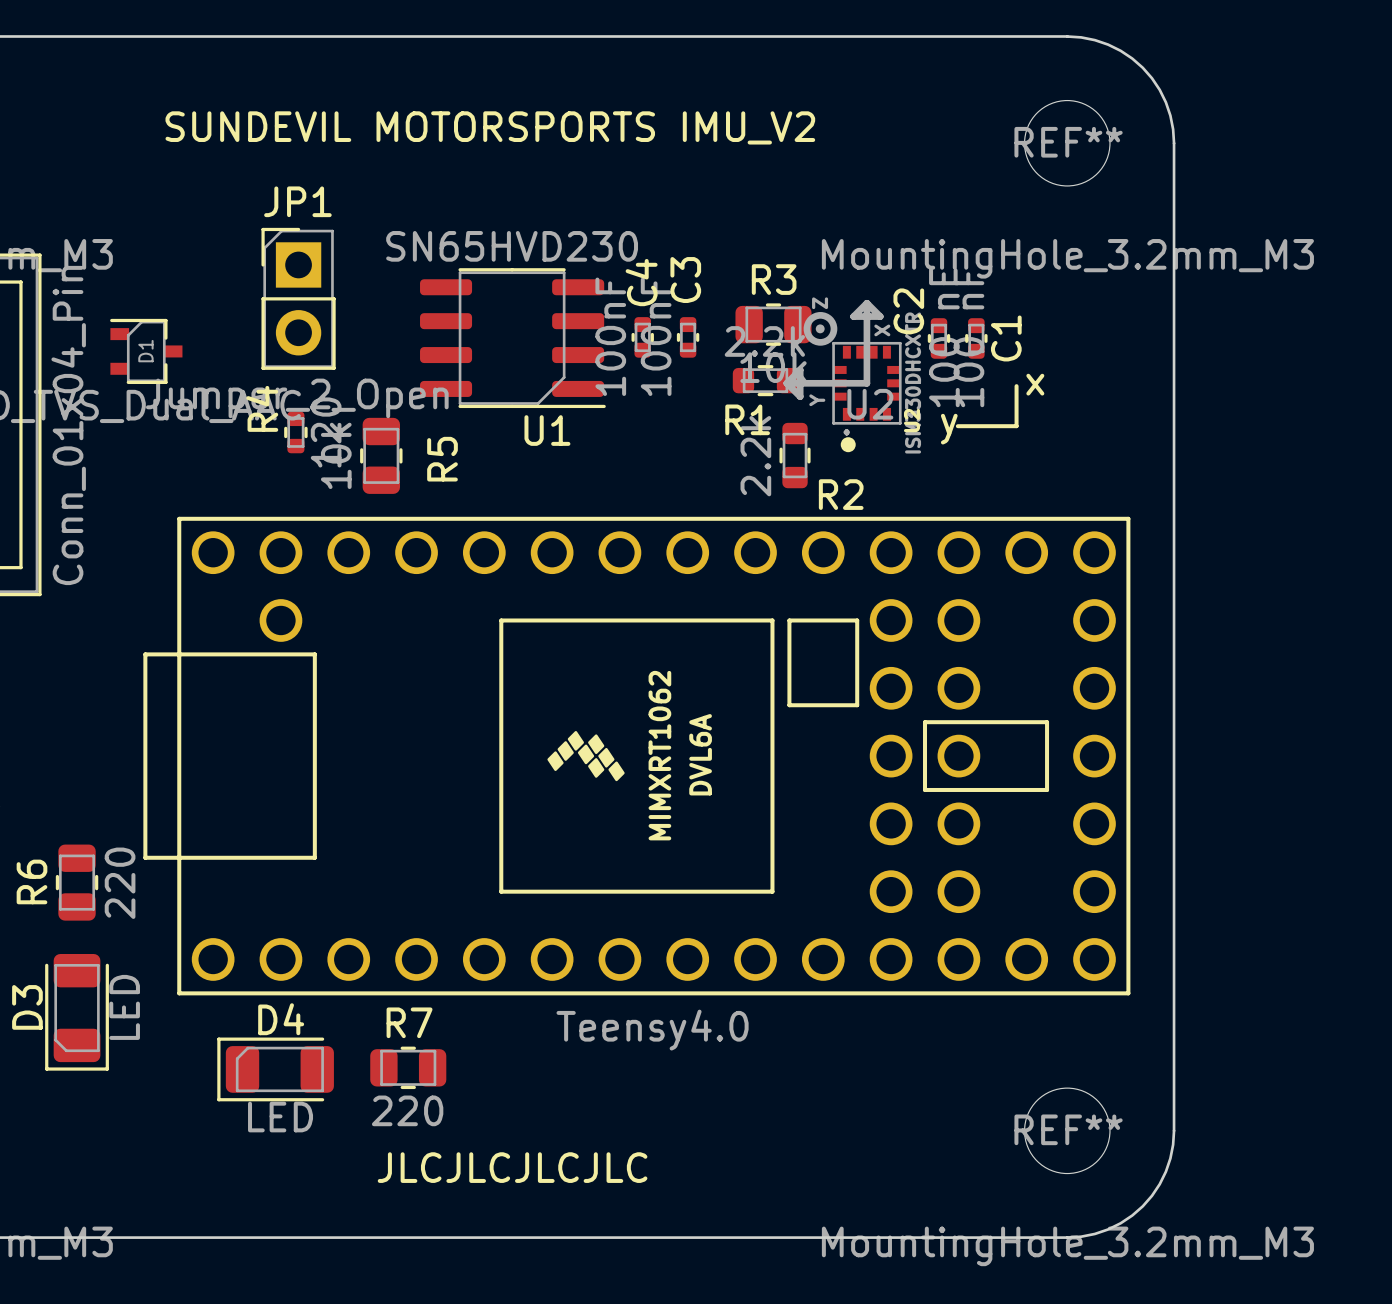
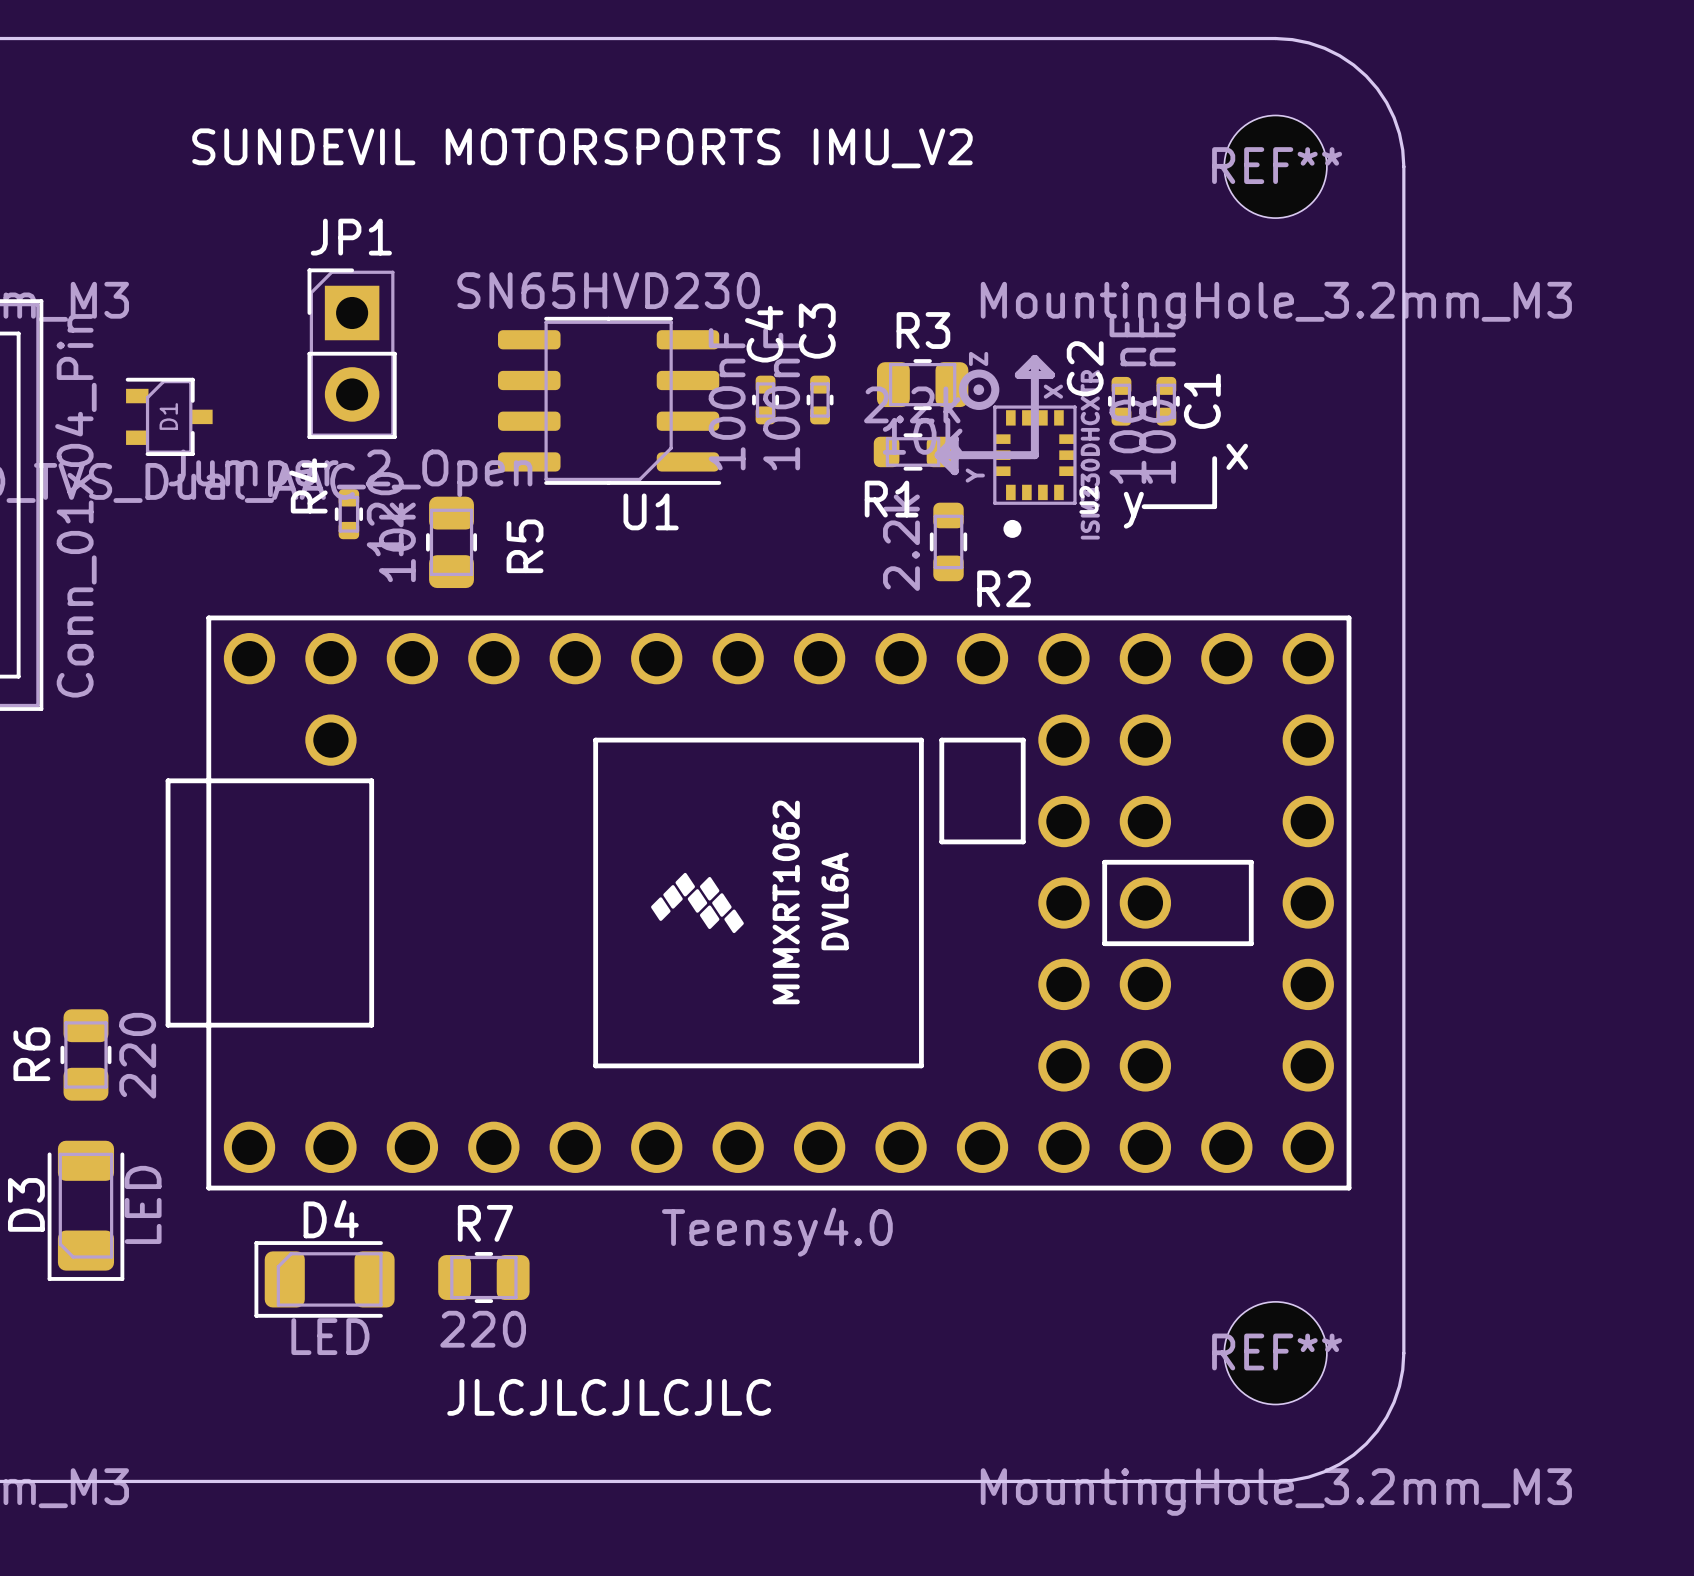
text: U2 (870, 404) -> none
text: . (846, 432) -> none

